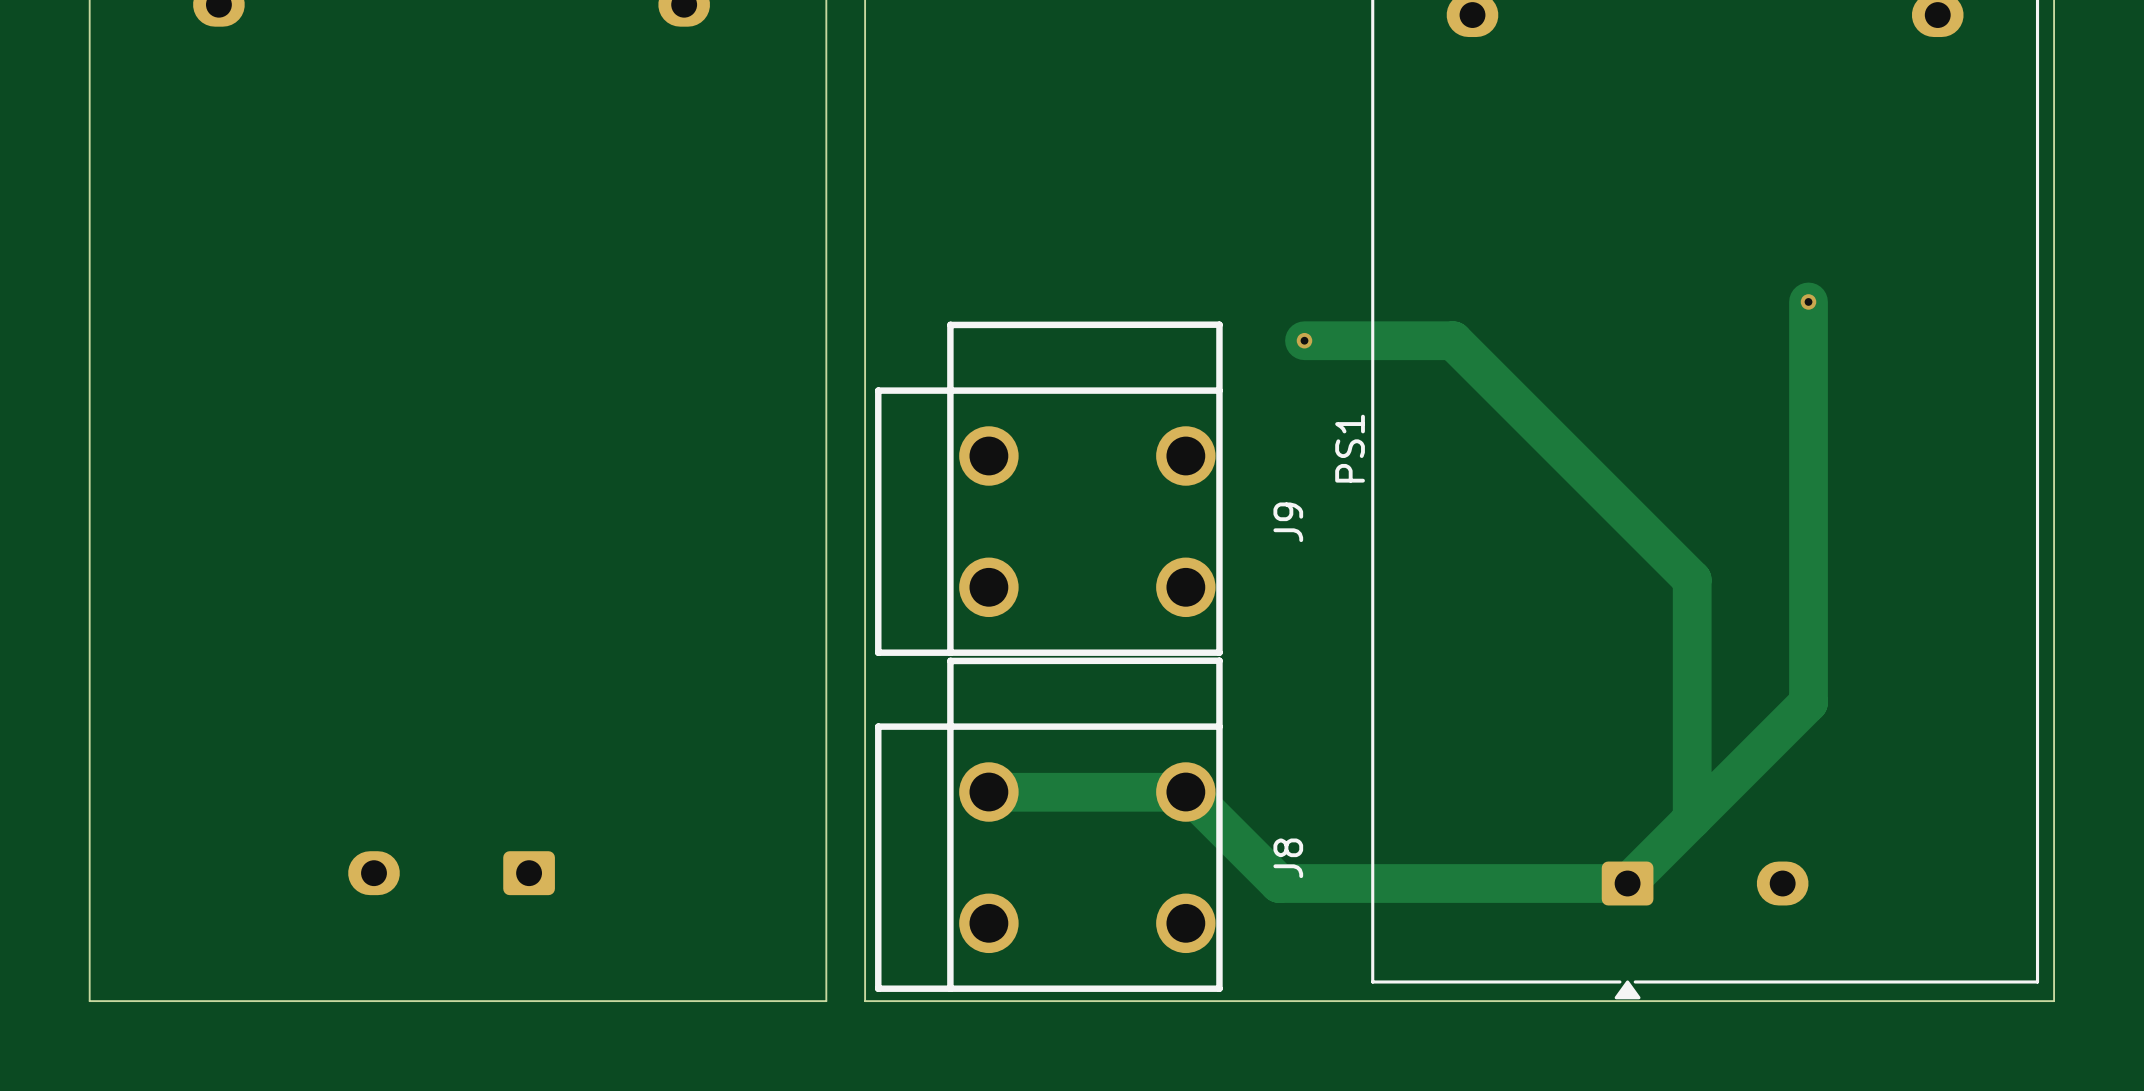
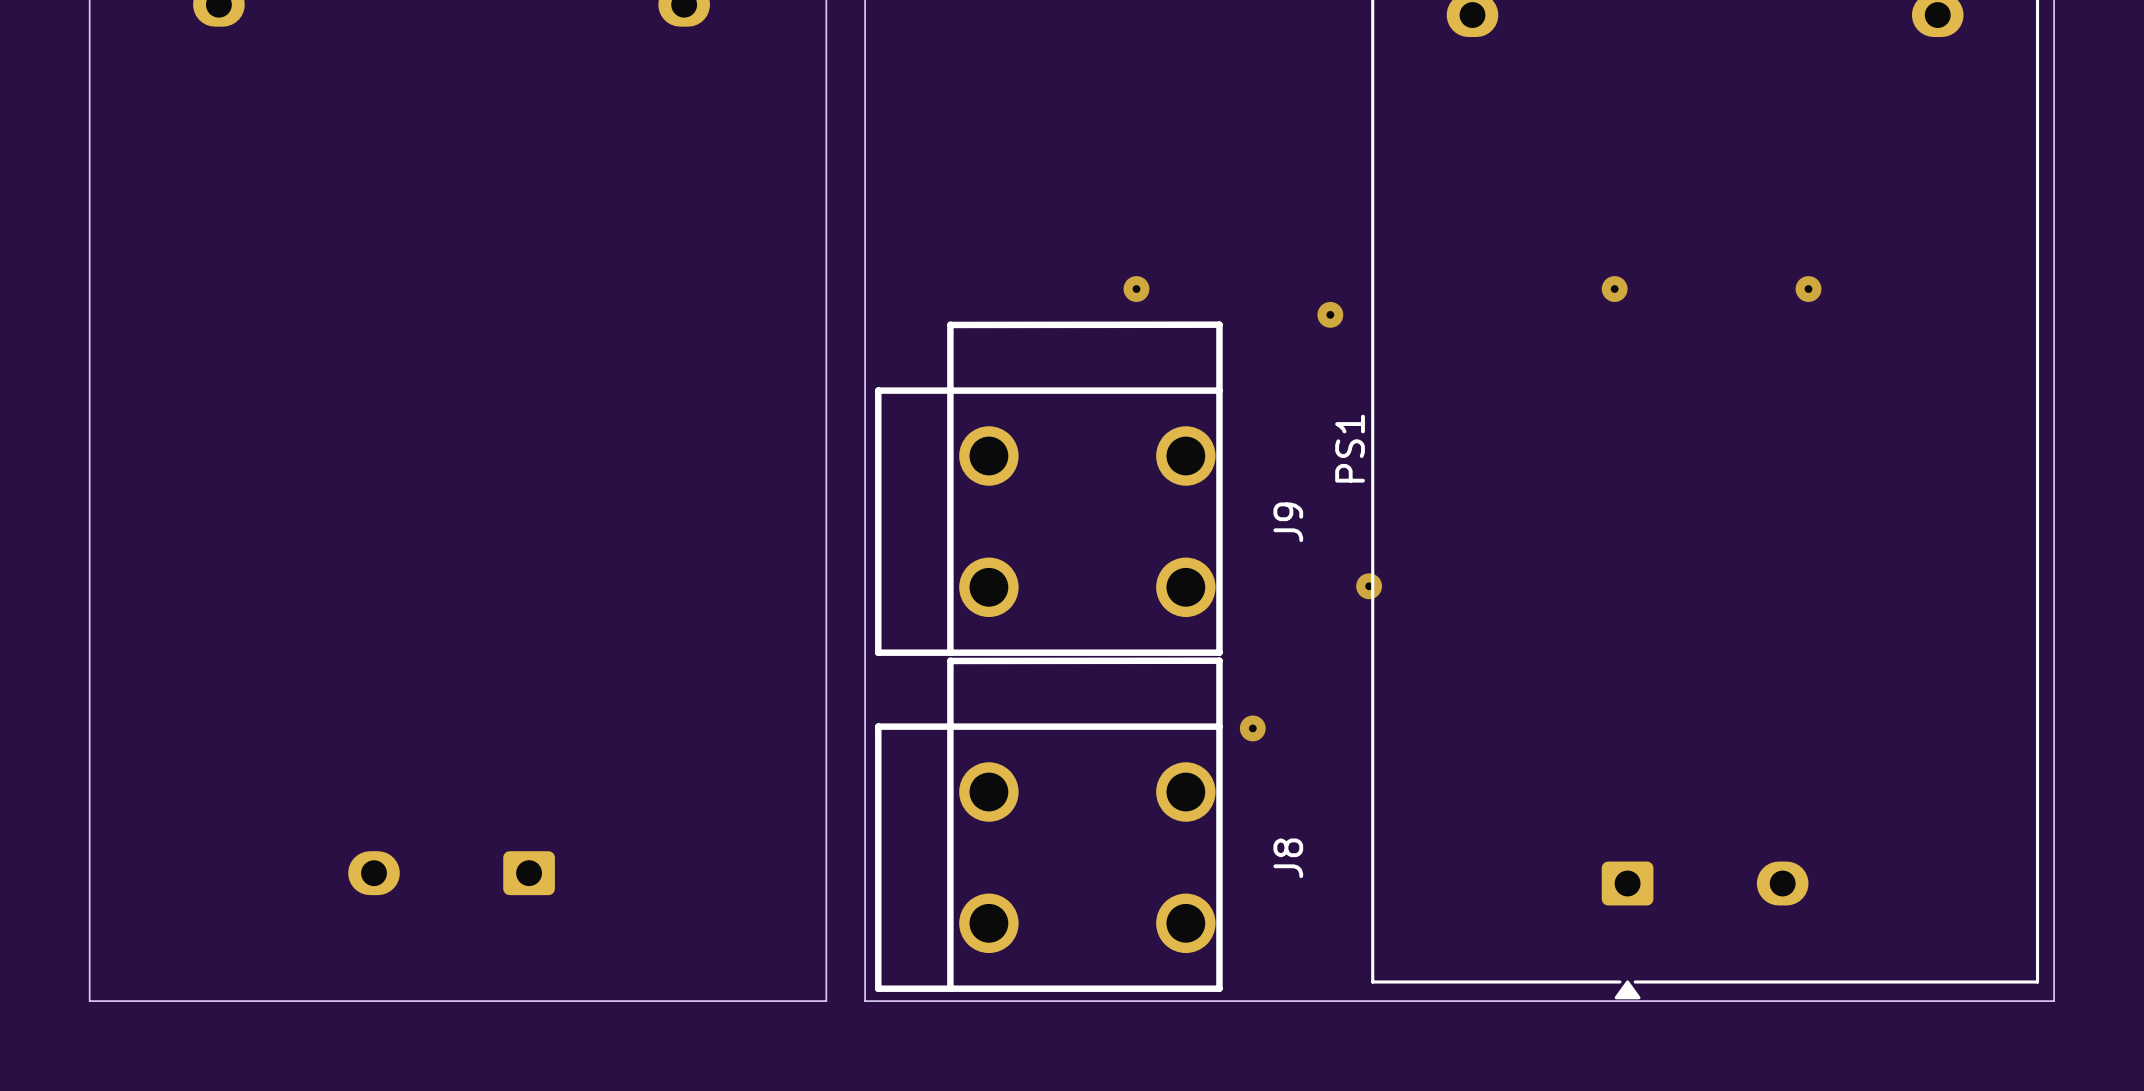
via: none -> (1136, 289)
via: none -> (1614, 289)
via size: [1800, 294, 1817, 310] -> [1795, 276, 1822, 302]
track: (1808, 301) (1808, 702) (1627, 883) (1279, 883) (1187, 792) (990, 792) -> none
via: none -> (1330, 314)
track: (1304, 340) (1453, 340) (1692, 579) (1692, 818) -> none
via: (1304, 340) -> none
via: none -> (1369, 586)
via: none -> (1252, 728)

